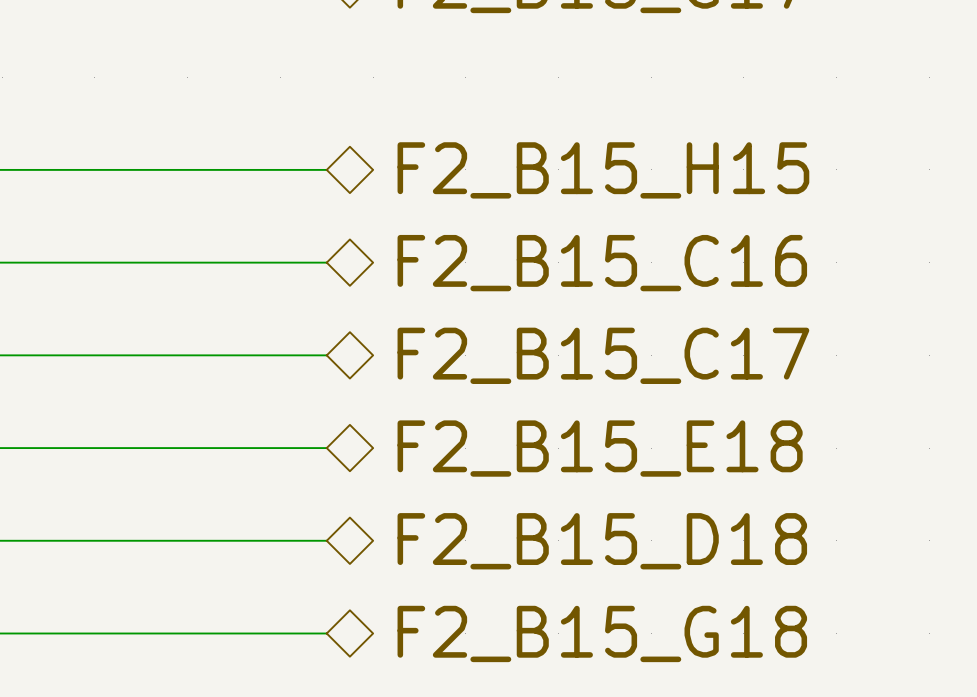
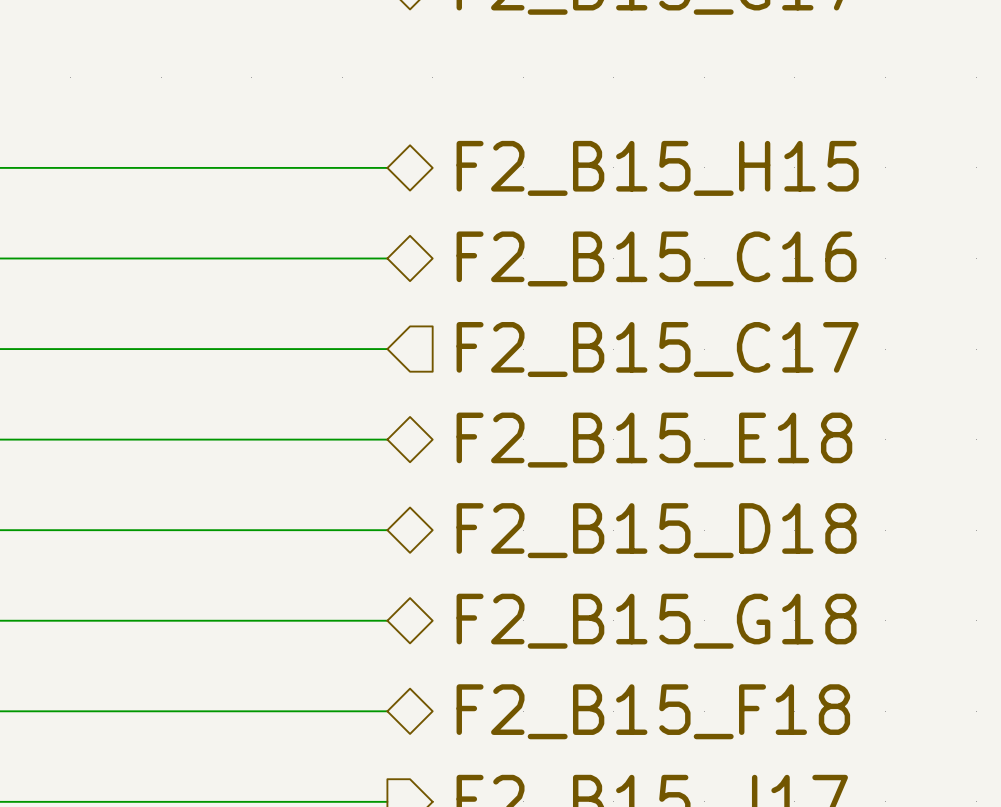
hierarchical label shape: bidirectional (603, 355) -> input (657, 349)

